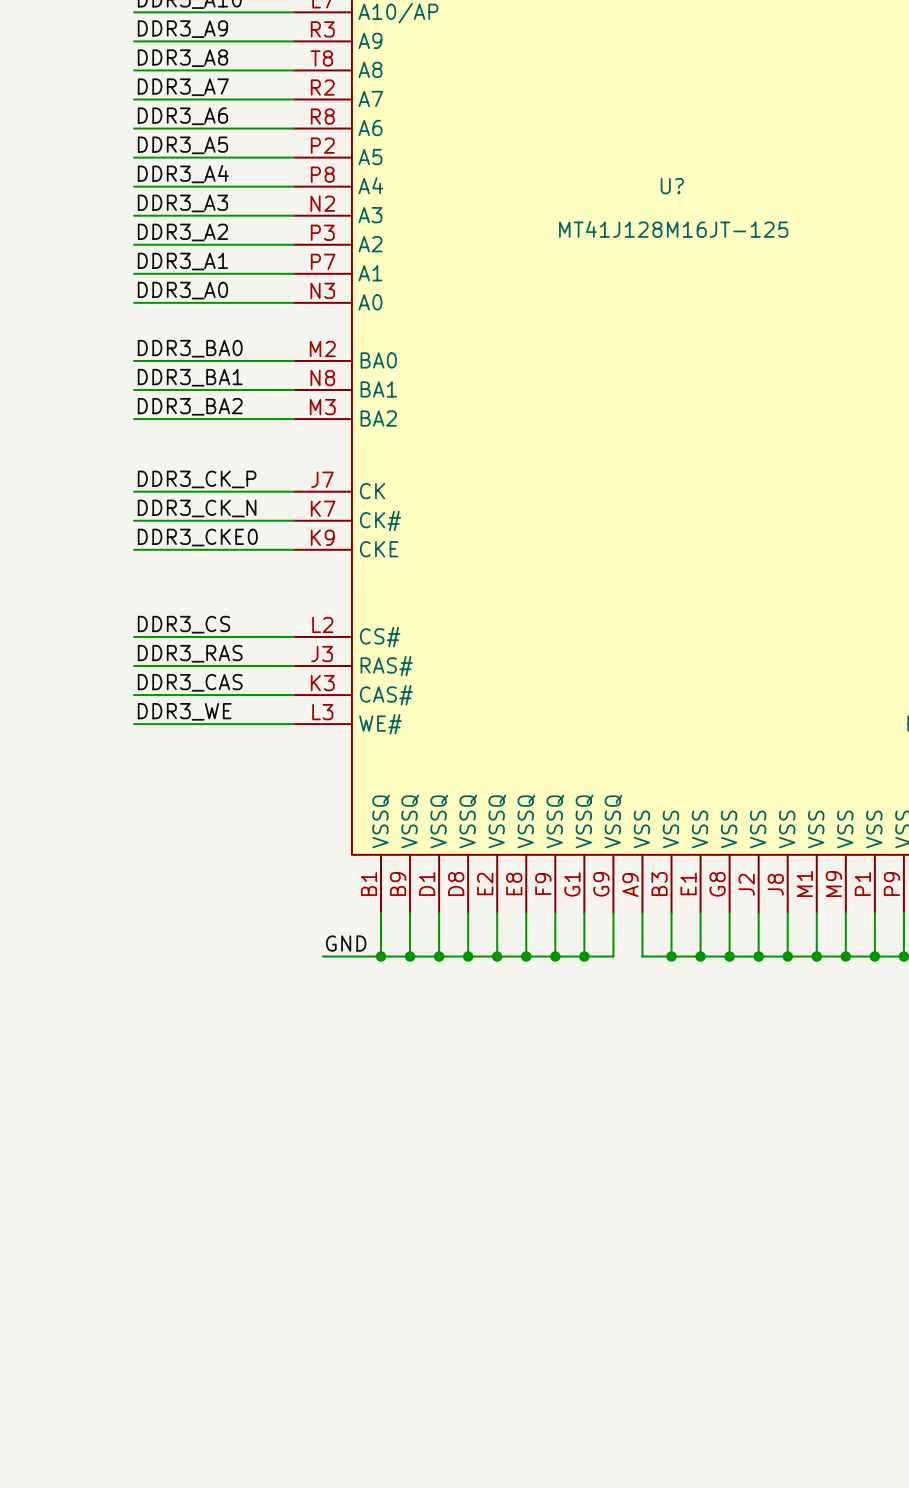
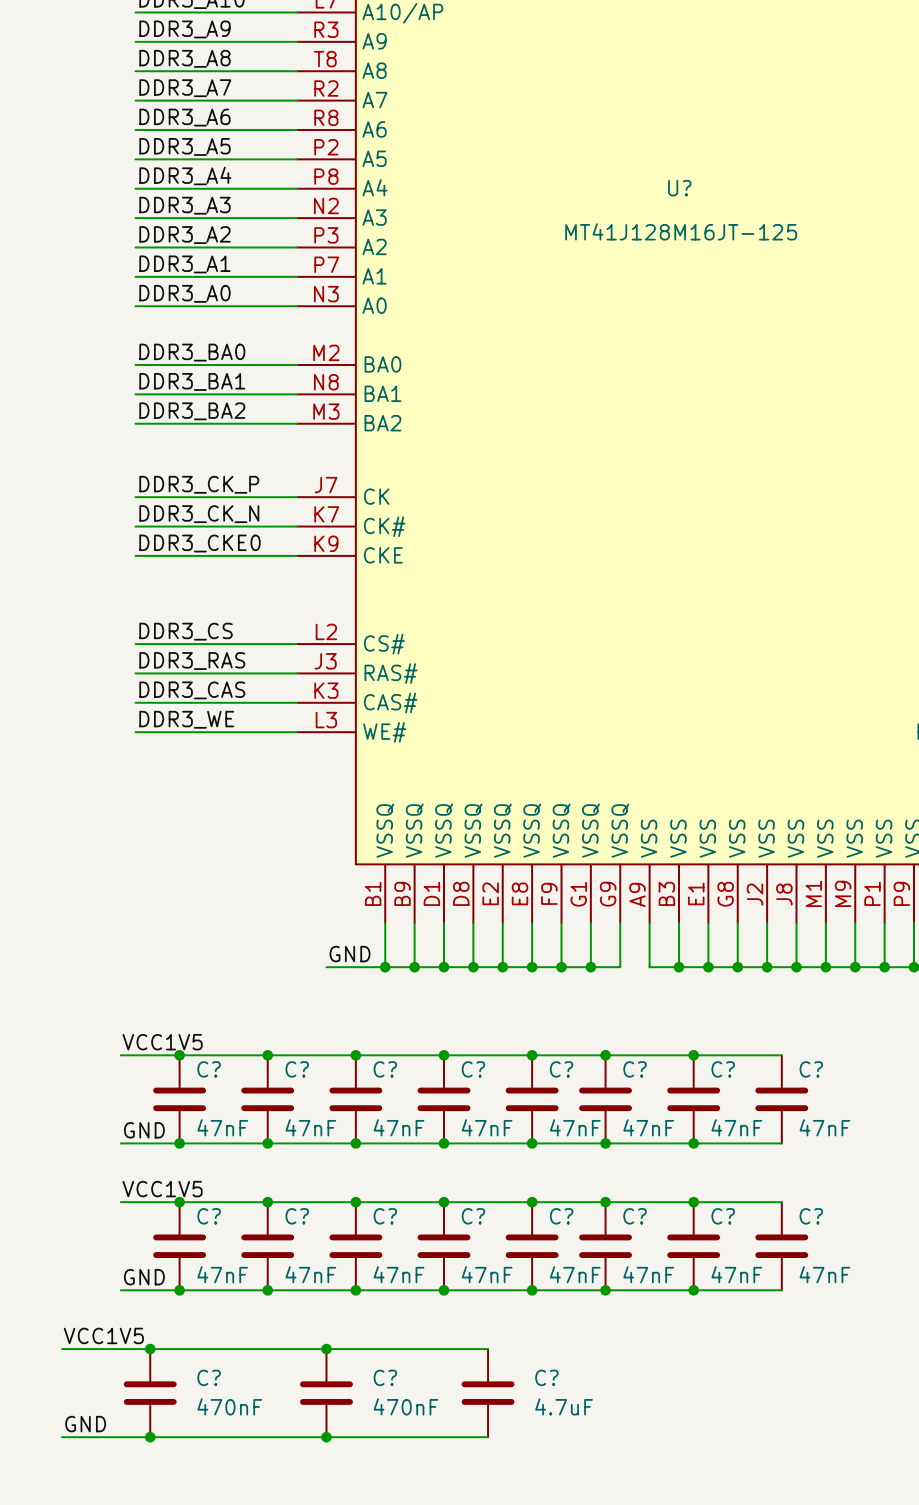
label: none -> VCC1V5 (162, 1042)
wire: none -> (120, 1055) (781, 1055)
junction: none -> (179, 1055)
junction: none -> (267, 1055)
junction: none -> (355, 1055)
junction: none -> (443, 1055)
junction: none -> (532, 1055)
junction: none -> (605, 1055)
junction: none -> (693, 1055)
C?: none -> 47nF (179, 1099)
C?: none -> 47nF (267, 1099)
C?: none -> 47nF (355, 1099)
C?: none -> 47nF (443, 1099)
C?: none -> 47nF (532, 1099)
C?: none -> 47nF (605, 1099)
C?: none -> 47nF (693, 1099)
C?: none -> 47nF (781, 1099)
label: none -> GND (144, 1130)
wire: none -> (120, 1143) (781, 1143)
junction: none -> (179, 1143)
junction: none -> (267, 1143)
junction: none -> (355, 1143)
junction: none -> (443, 1143)
junction: none -> (532, 1143)
junction: none -> (605, 1143)
junction: none -> (693, 1143)
label: none -> VCC1V5 (162, 1189)
wire: none -> (120, 1202) (781, 1202)
junction: none -> (179, 1202)
junction: none -> (267, 1202)
junction: none -> (355, 1202)
junction: none -> (443, 1202)
junction: none -> (532, 1202)
junction: none -> (605, 1202)
junction: none -> (693, 1202)
C?: none -> 47nF (179, 1246)
C?: none -> 47nF (267, 1246)
C?: none -> 47nF (355, 1246)
C?: none -> 47nF (443, 1246)
C?: none -> 47nF (532, 1246)
C?: none -> 47nF (605, 1246)
C?: none -> 47nF (693, 1246)
C?: none -> 47nF (781, 1246)
label: none -> GND (144, 1277)
wire: none -> (120, 1290) (781, 1290)
junction: none -> (179, 1290)
junction: none -> (267, 1290)
junction: none -> (355, 1290)
junction: none -> (443, 1290)
junction: none -> (532, 1290)
junction: none -> (605, 1290)
junction: none -> (693, 1290)
label: none -> VCC1V5 (103, 1335)
wire: none -> (62, 1349) (488, 1349)
junction: none -> (150, 1349)
junction: none -> (326, 1349)
C?: none -> 470nF (150, 1393)
C?: none -> 470nF (326, 1393)
C?: none -> 4.7uF (488, 1393)
label: none -> GND (85, 1424)
wire: none -> (62, 1437) (488, 1437)
junction: none -> (150, 1437)
junction: none -> (326, 1437)

